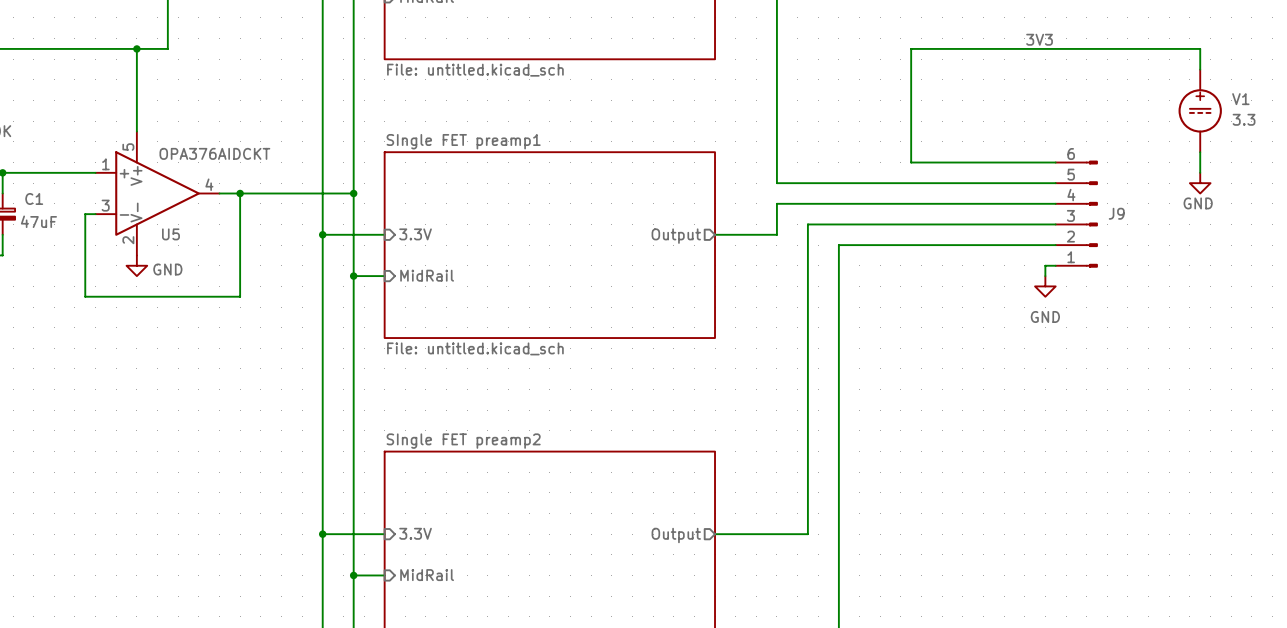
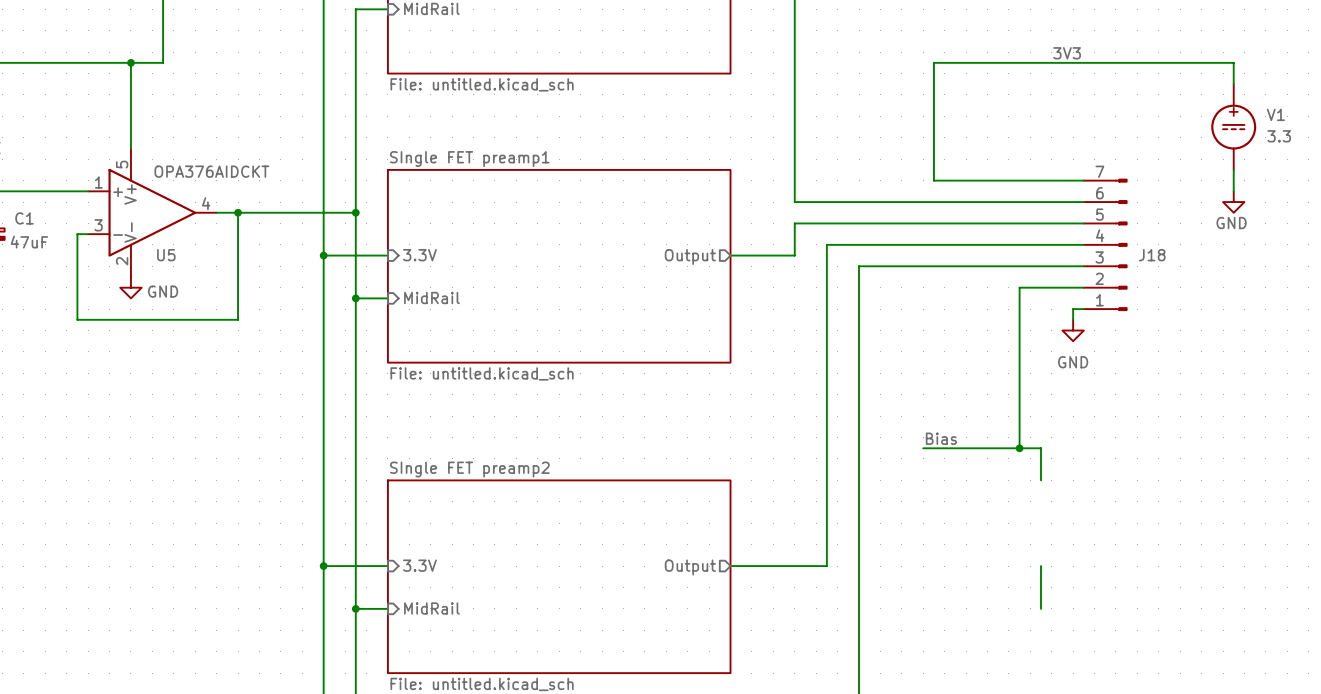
J9: (1076, 214) -> none
J18: none -> (1105, 244)
wire: (1045, 265) (1045, 276) -> (1073, 287) (1019, 287) (1019, 448)
power symbol position: GND (1045, 286) -> GND (1073, 330)
label: none -> Bias (941, 438)
wire: none -> (923, 448) (1041, 448) (1041, 480)
junction: none -> (1019, 448)
wire: none -> (1041, 566) (1041, 608)

